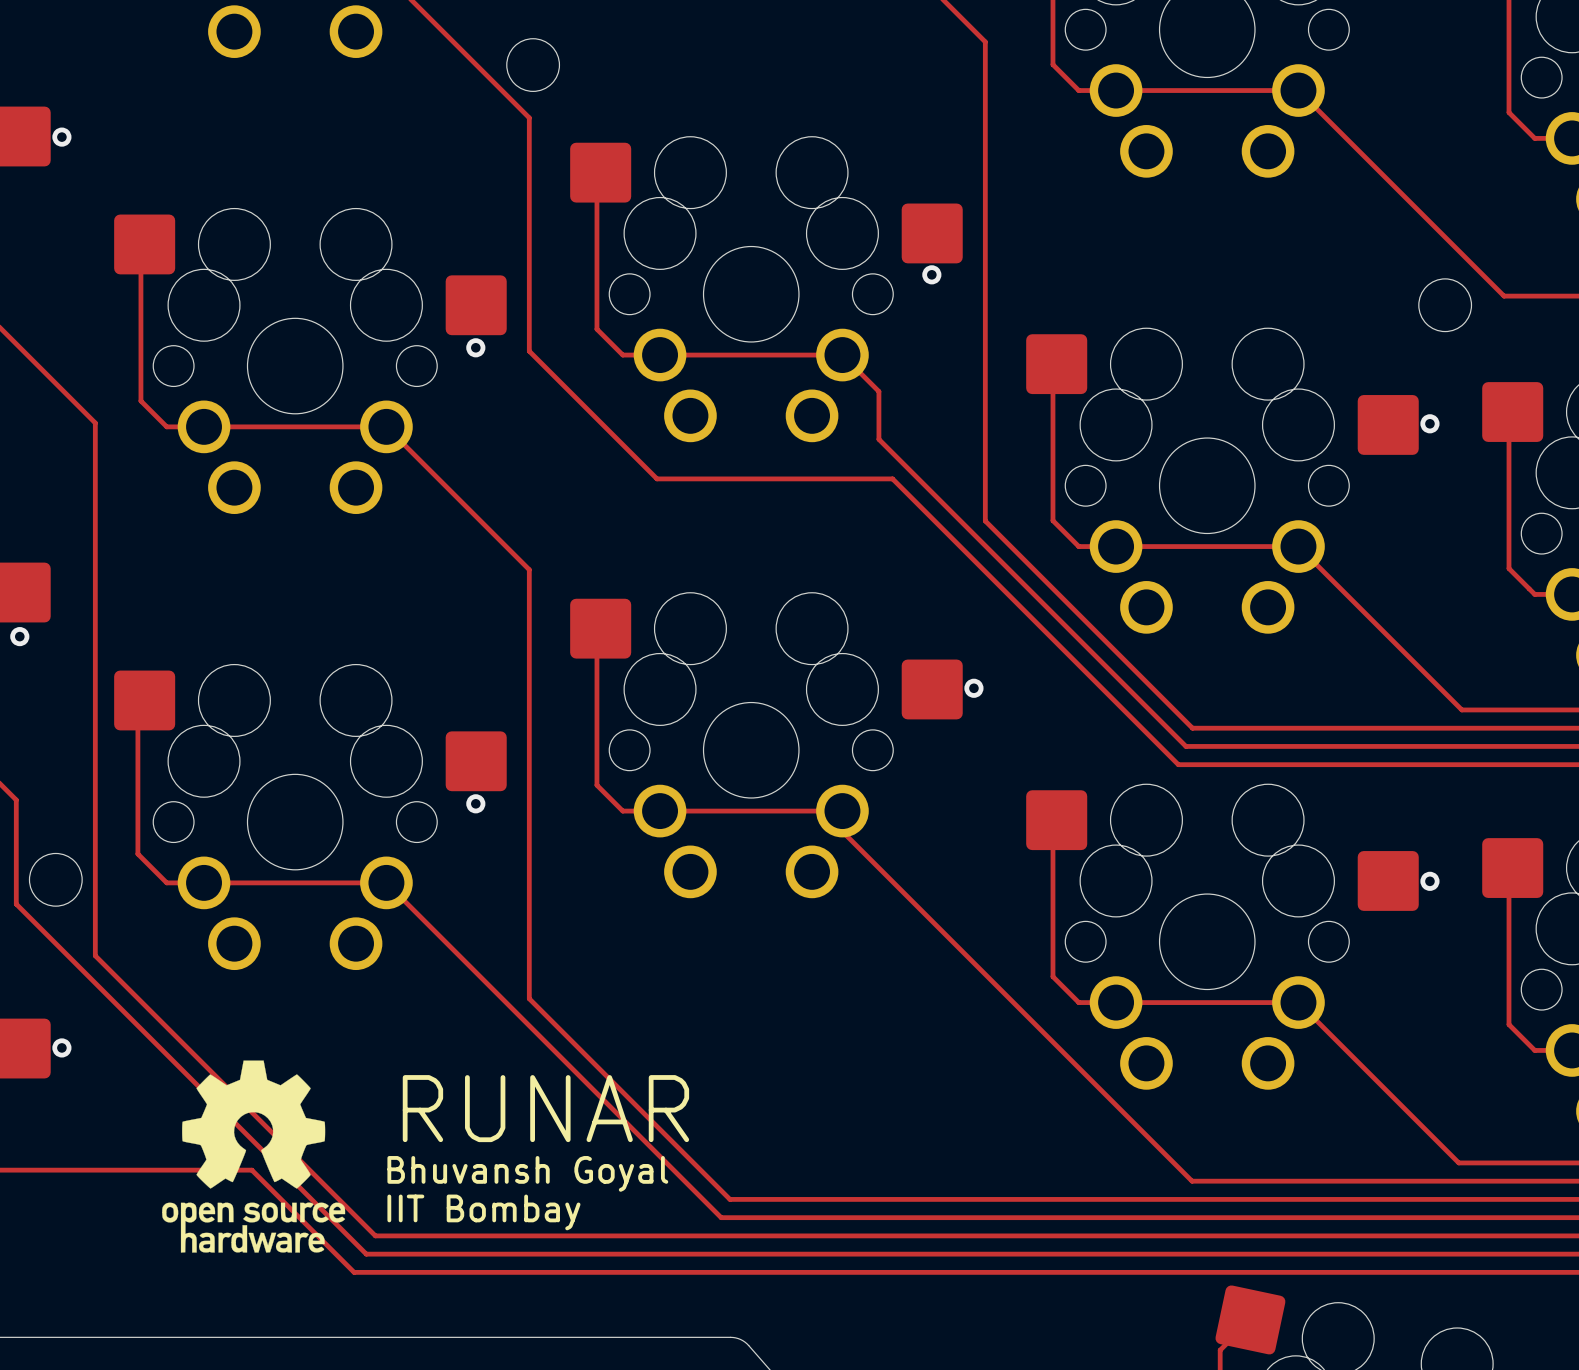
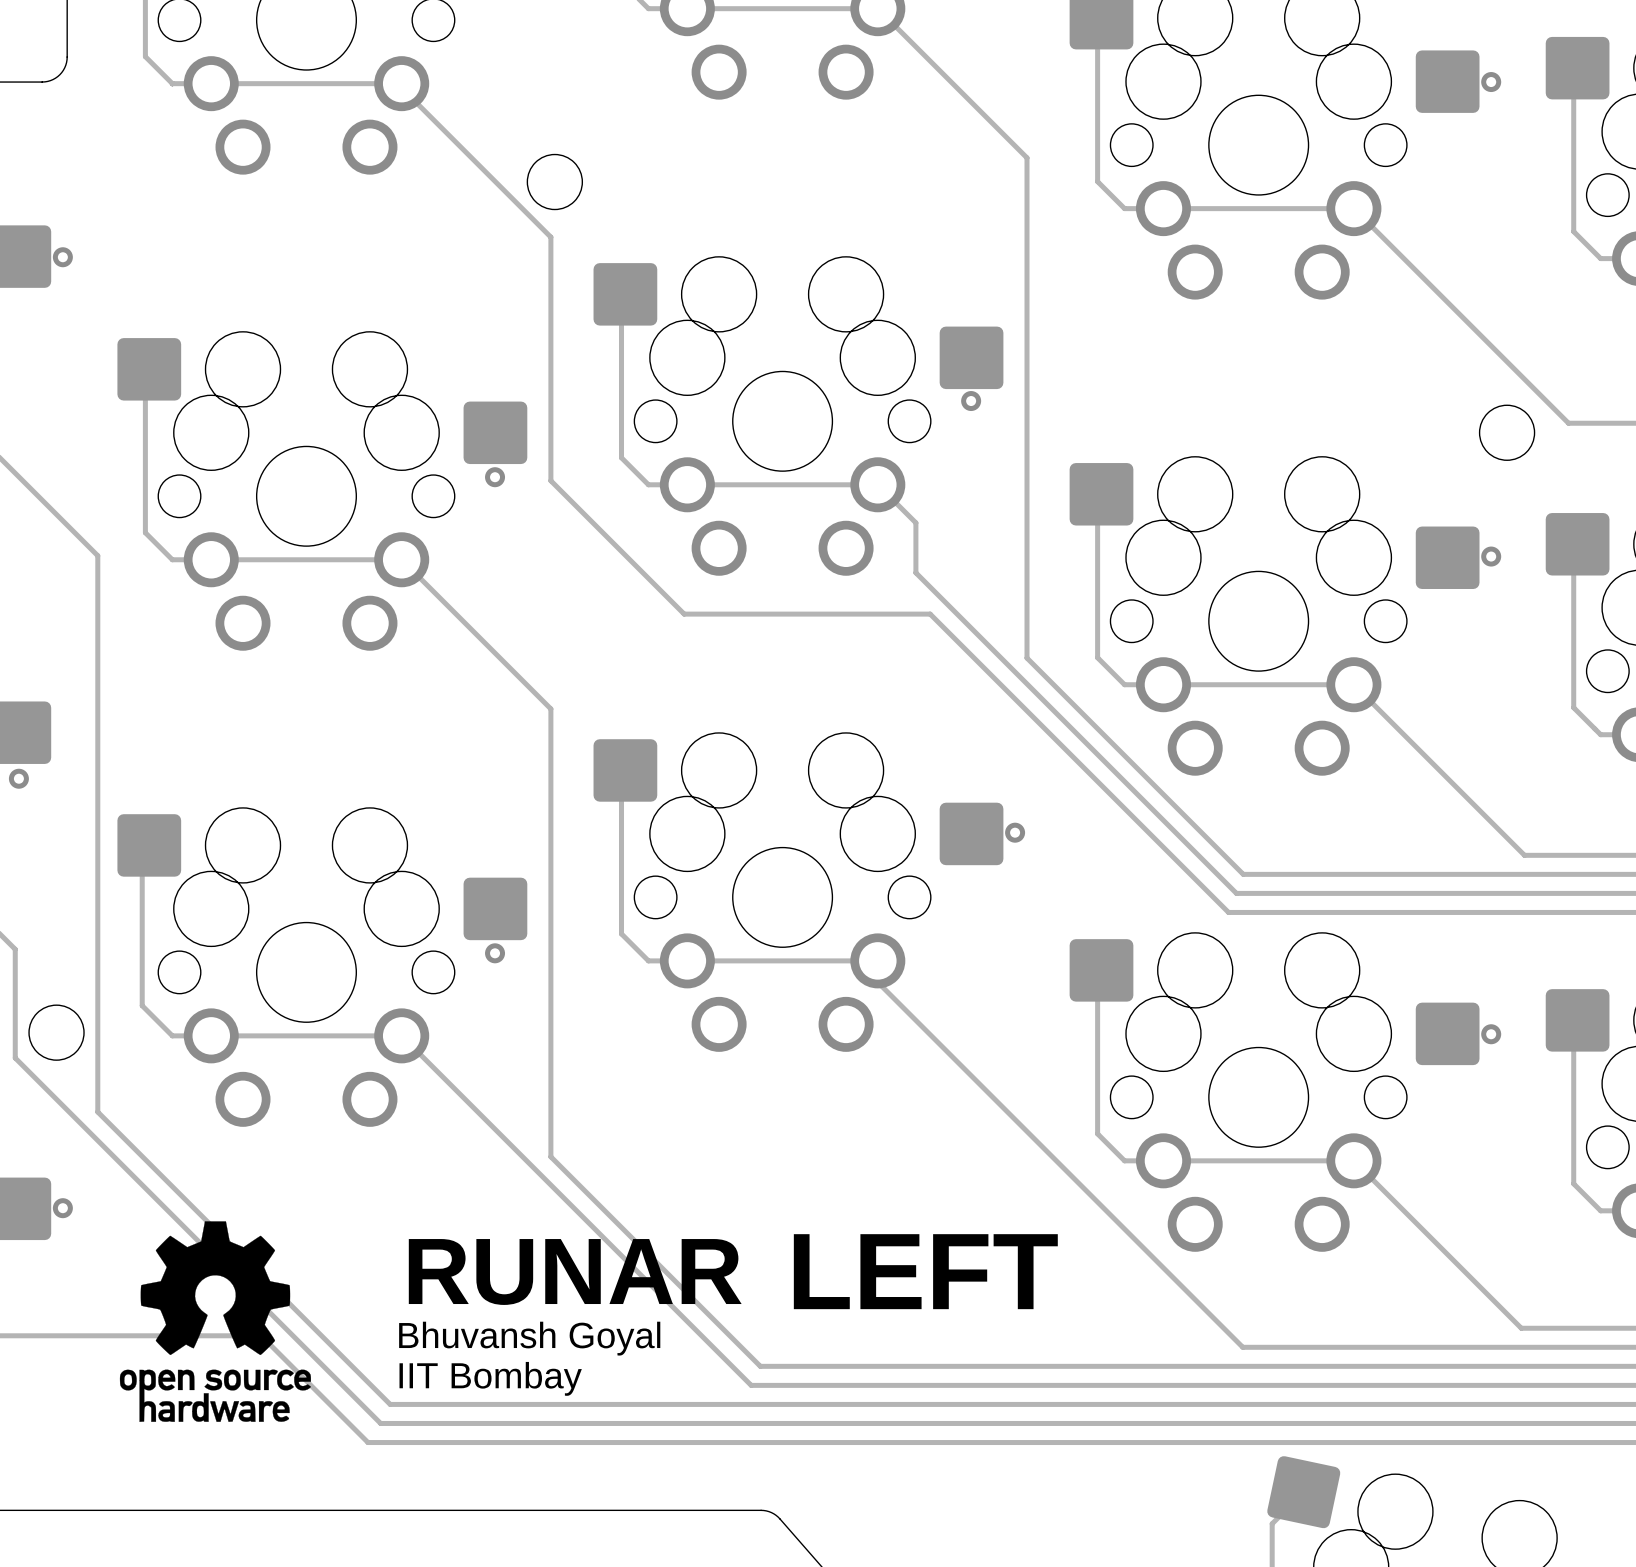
text: none -> LEFT (925, 1271)
drawing position: (253, 1156) -> (215, 1321)

